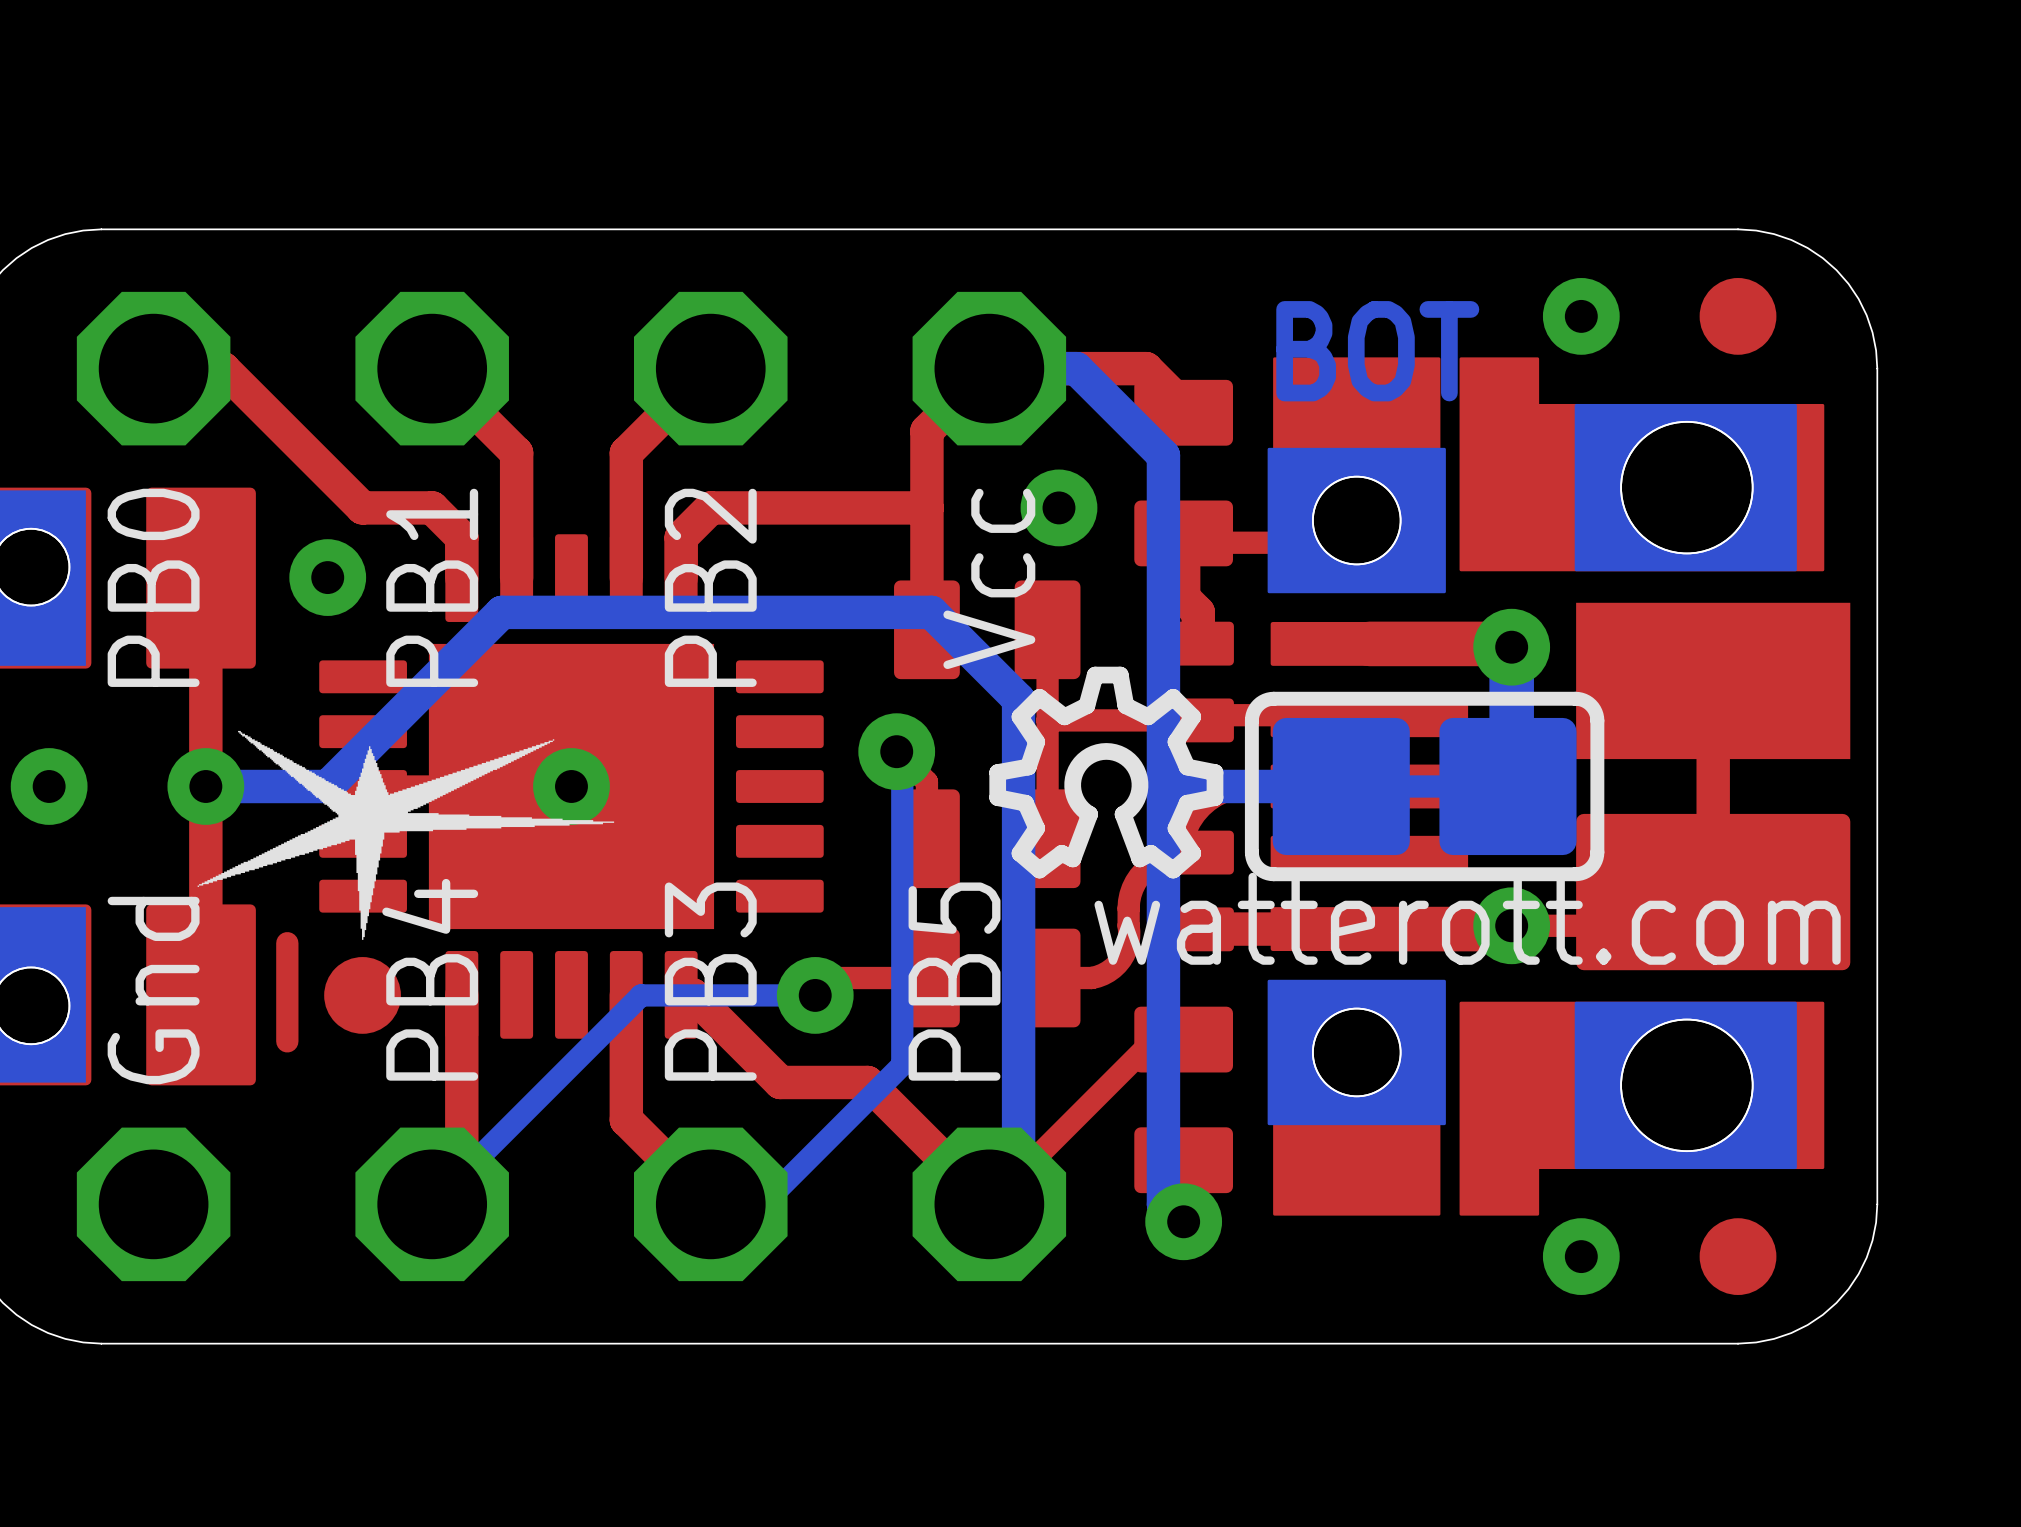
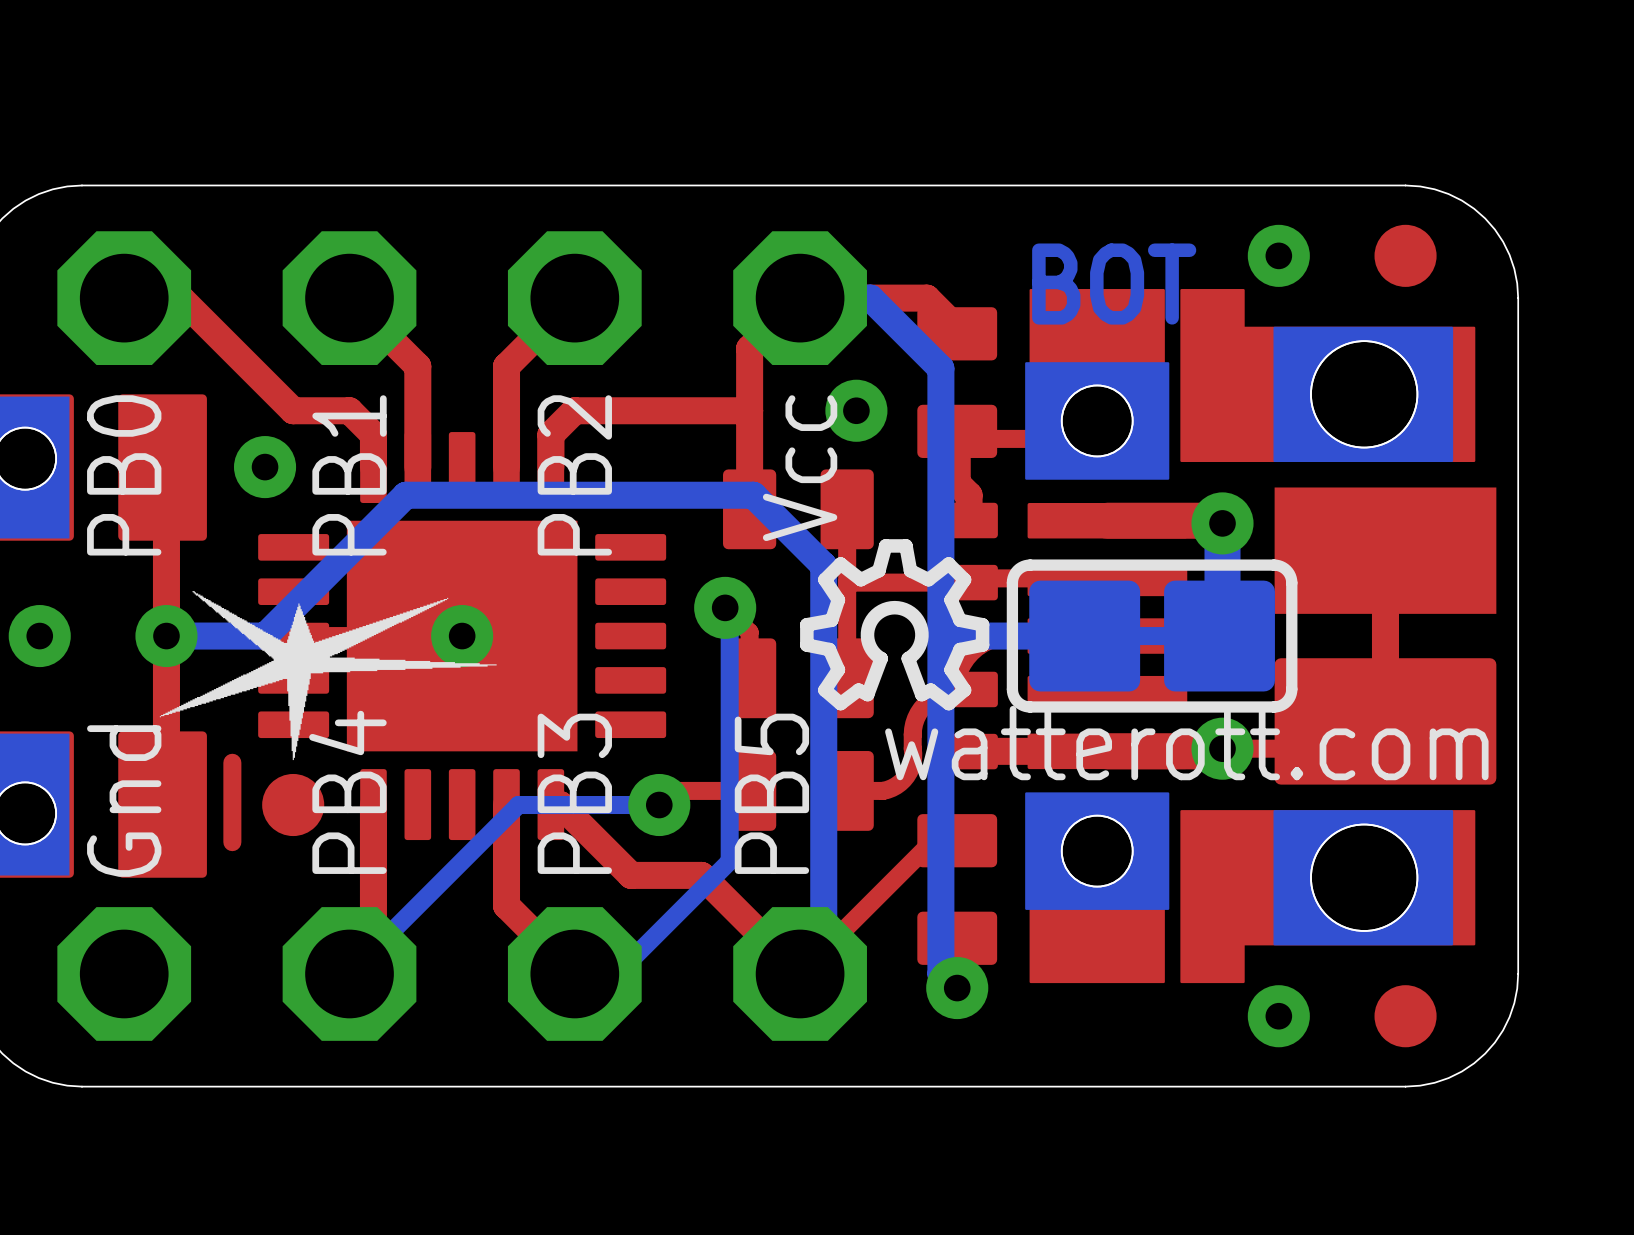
part footprint: [76, 291, 1067, 446] -> [57, 231, 867, 365]
part footprint: [76, 1127, 1067, 1282] -> [57, 907, 867, 1041]

